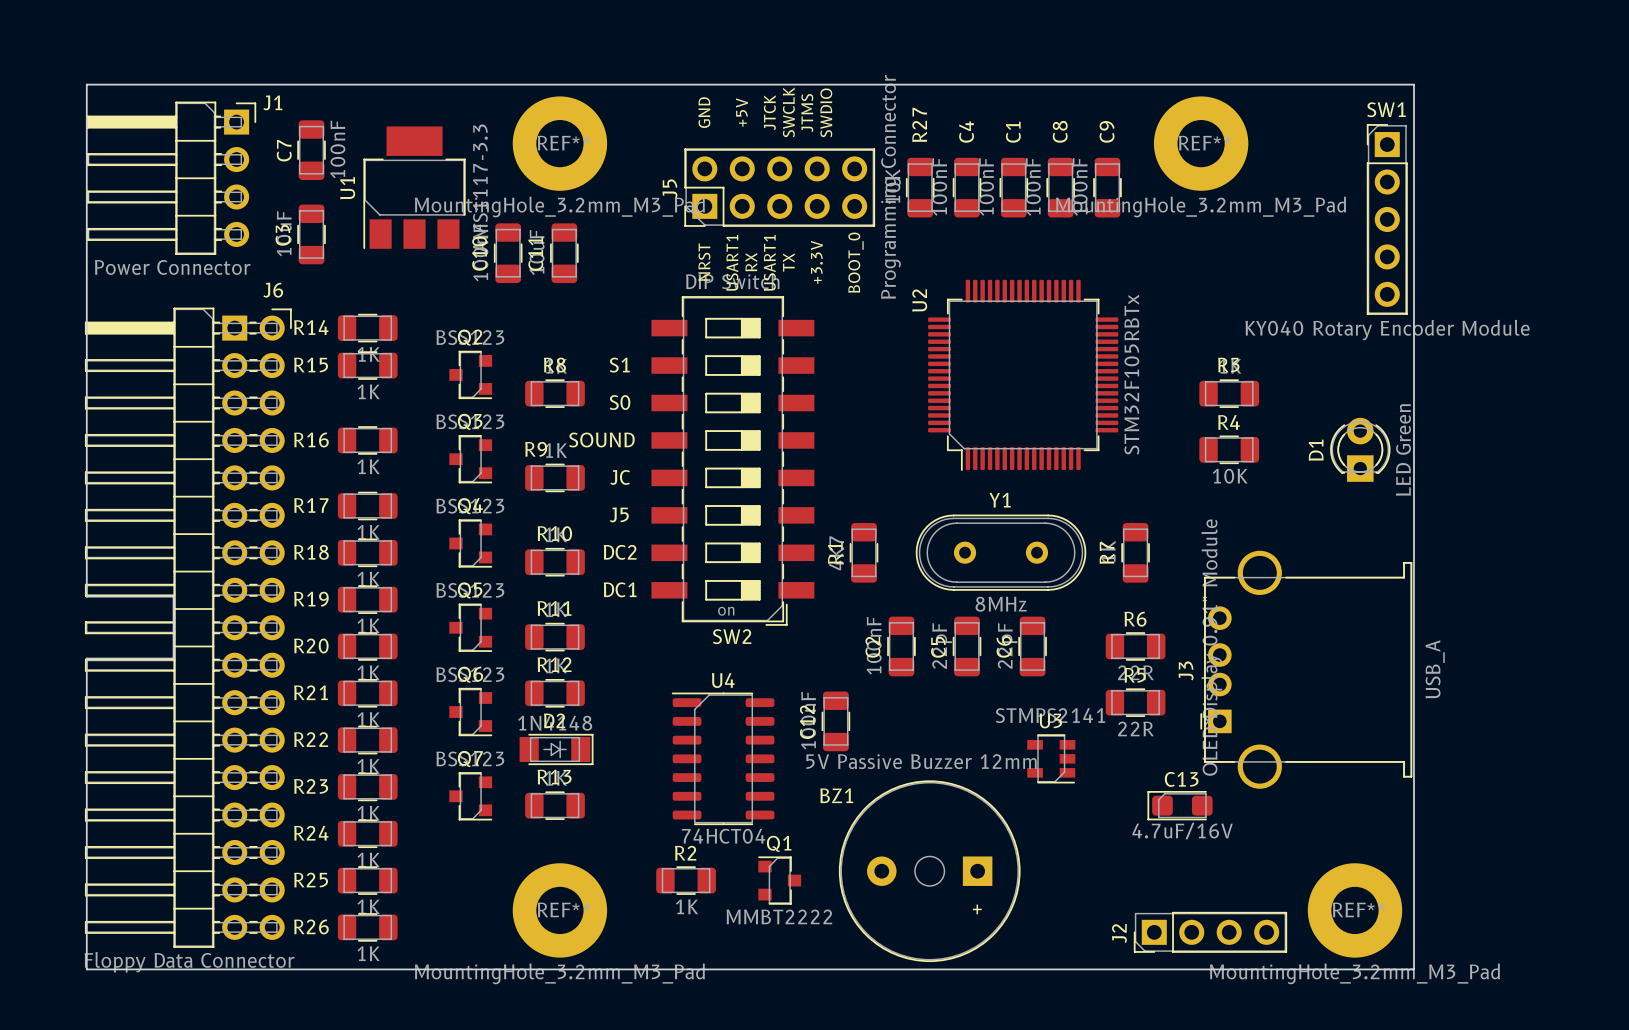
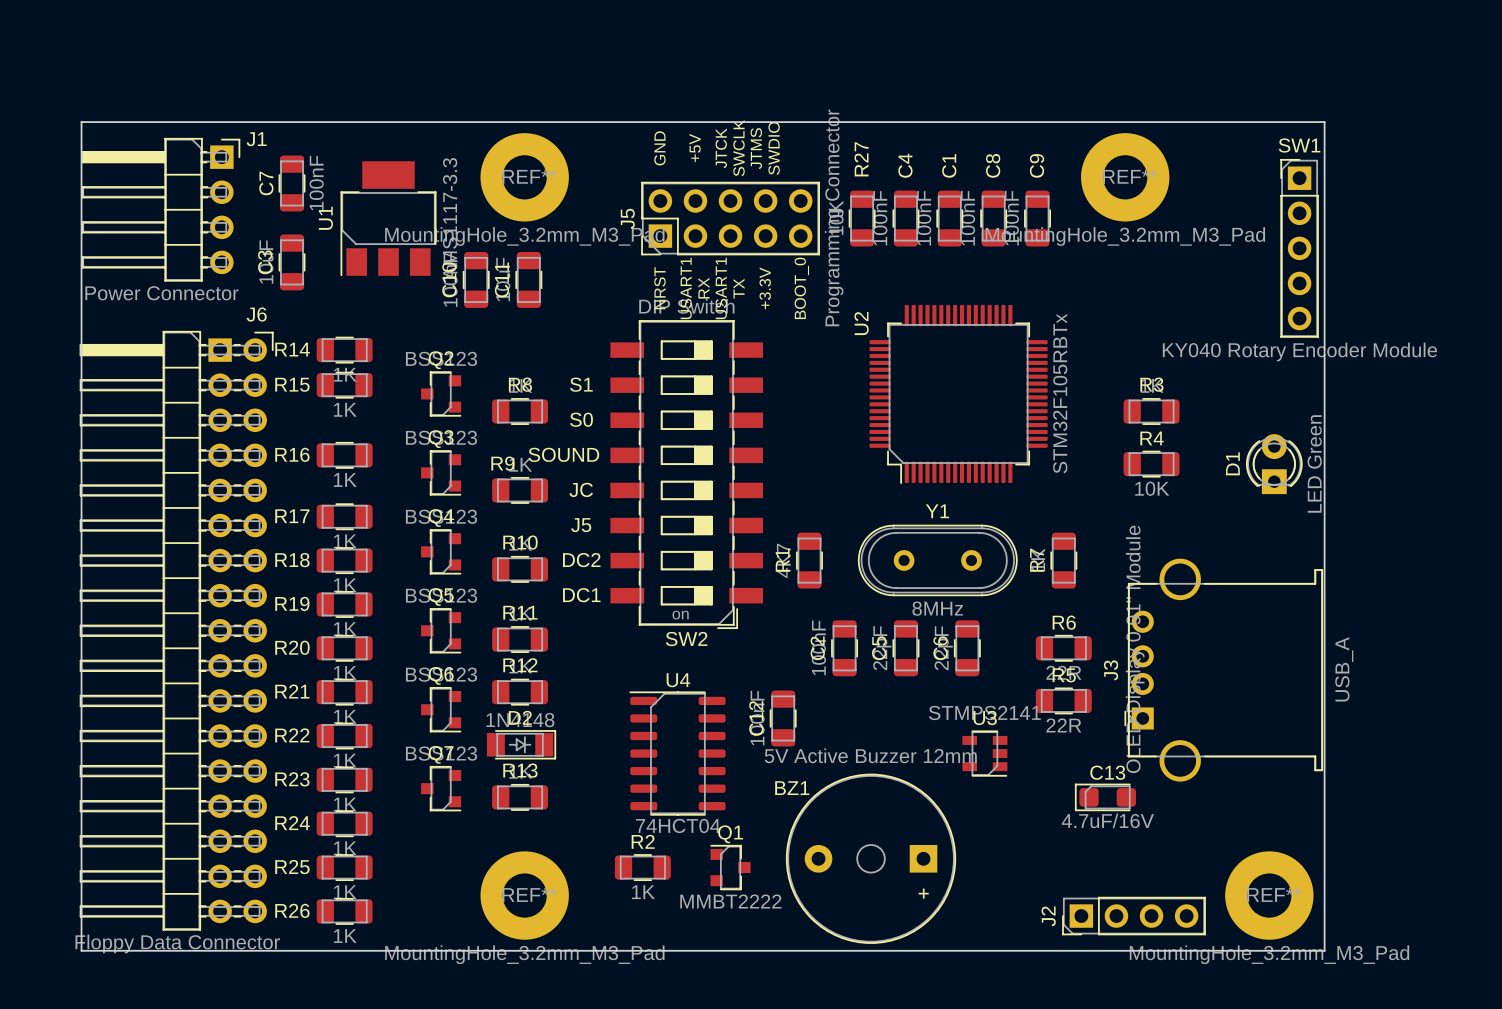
board edge: (86, 596) (173, 596) (173, 658) (86, 658) -> (81, 601) (81, 659)
BZ1 value: 5V Passive Buzzer 12mm (921, 761) -> 5V Active Buzzer 12mm (870, 755)
BZ1 footprint: [838, 780, 1021, 963] -> [785, 773, 957, 944]

